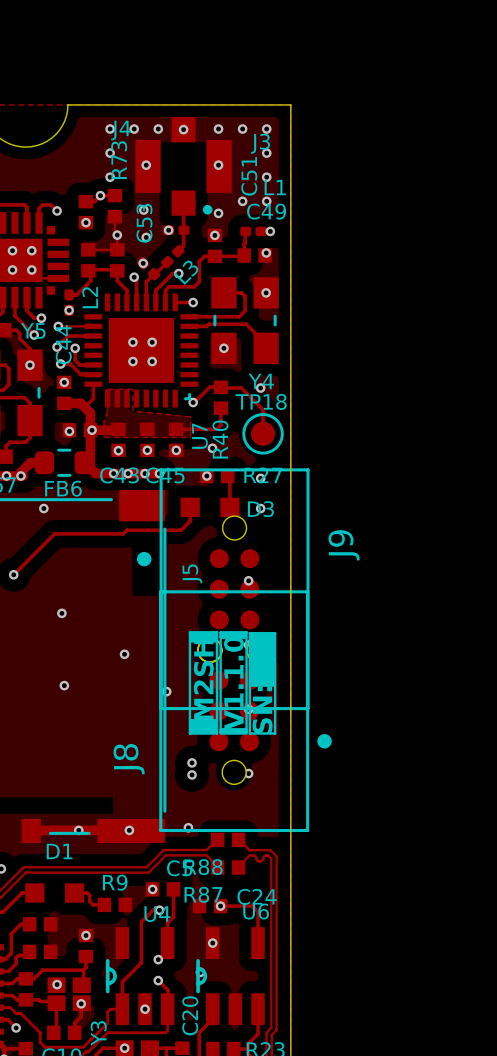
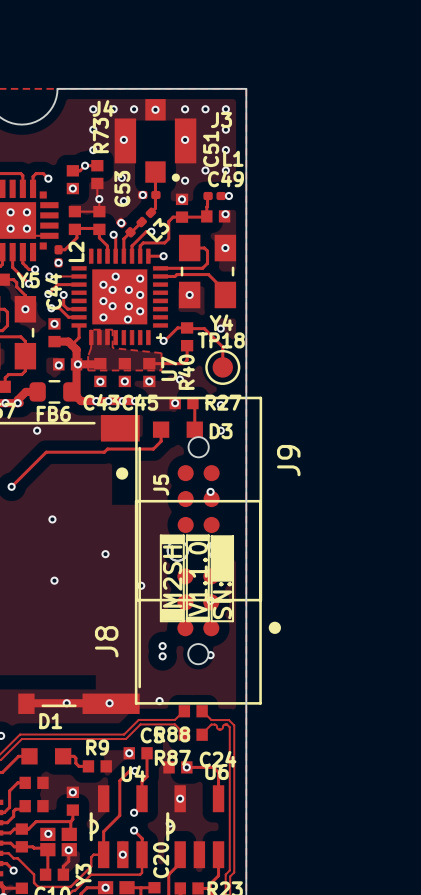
via: none -> (115, 276)
via: none -> (140, 278)
via: none -> (103, 284)
via: none -> (140, 294)
via: none -> (103, 301)
via: none -> (140, 311)
via: none -> (103, 317)
via: none -> (127, 319)

